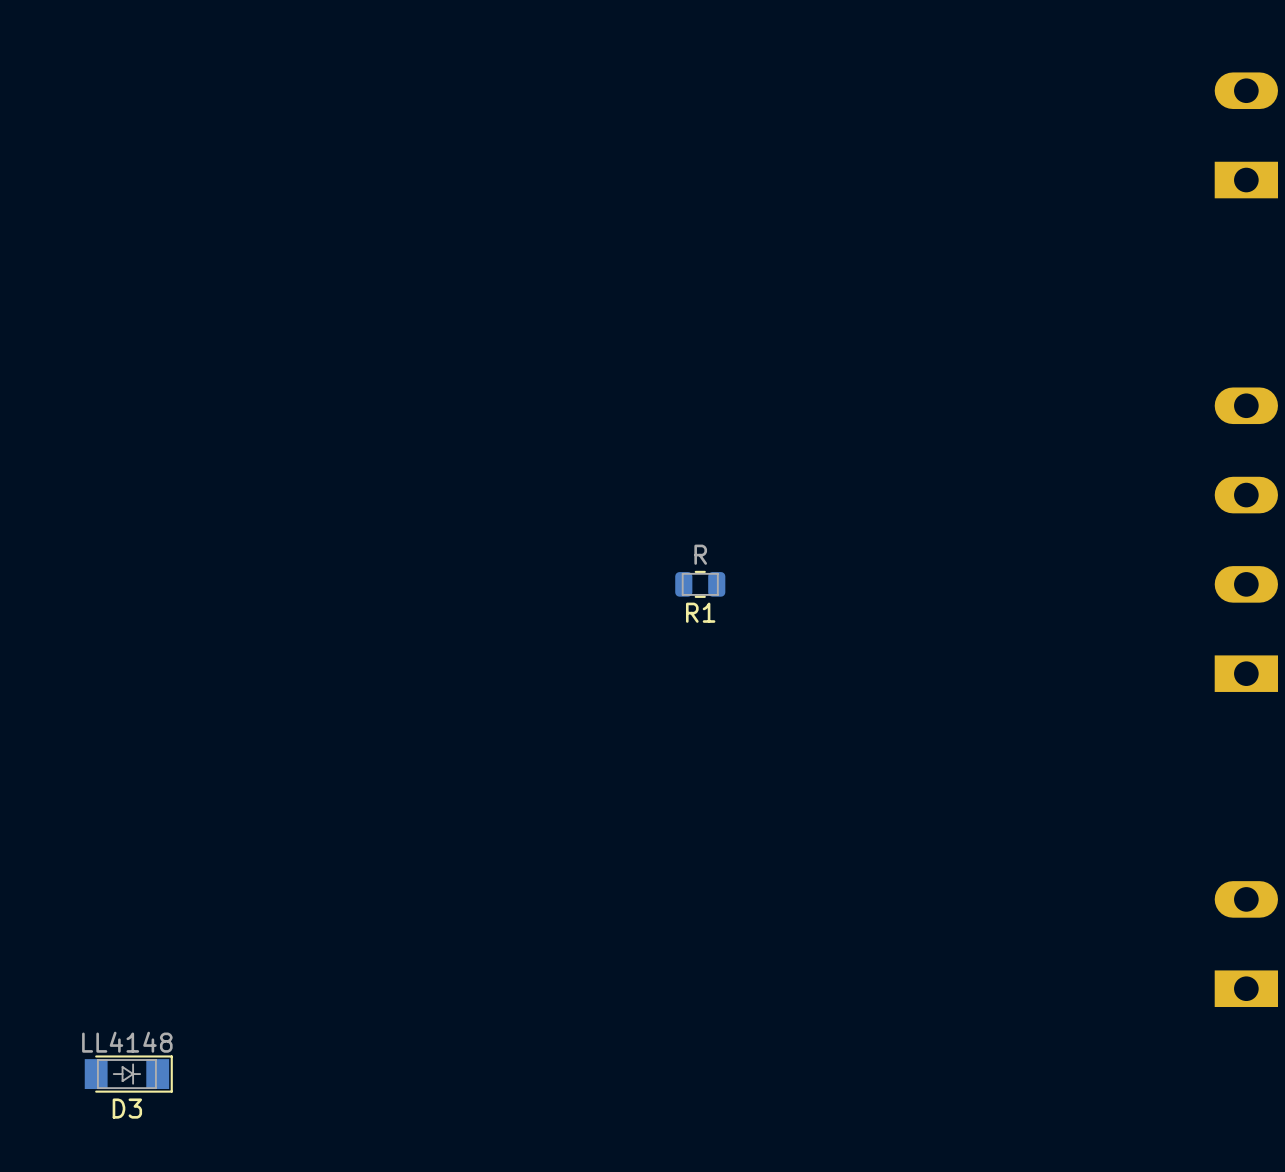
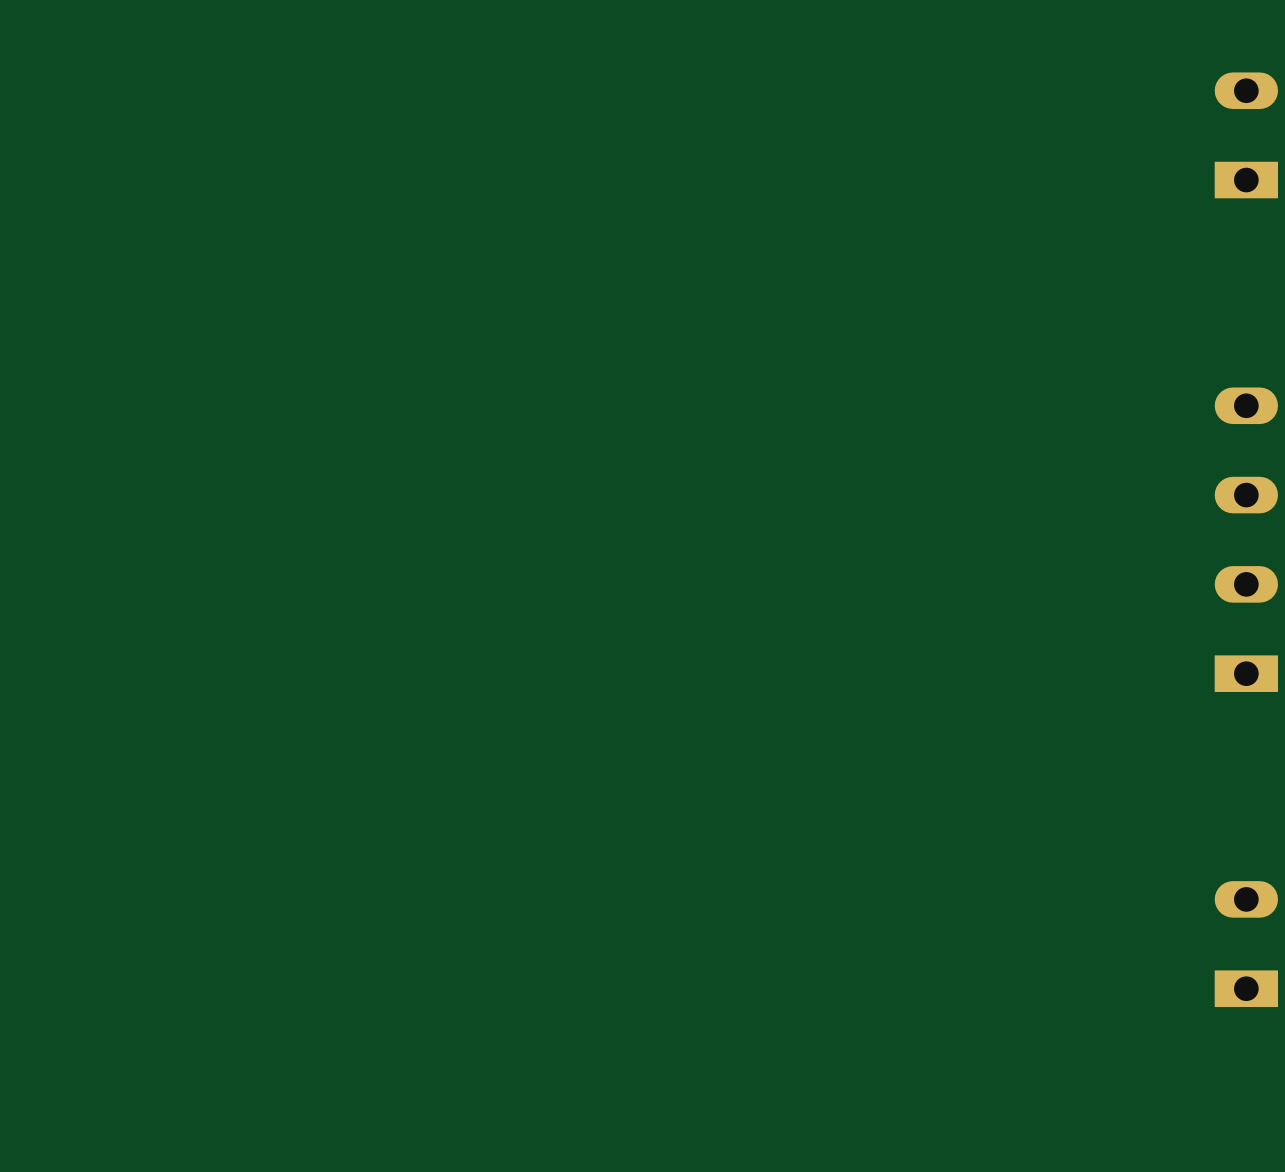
R1: R (700, 584) -> none
D3: LL4148 (128, 1074) -> none

